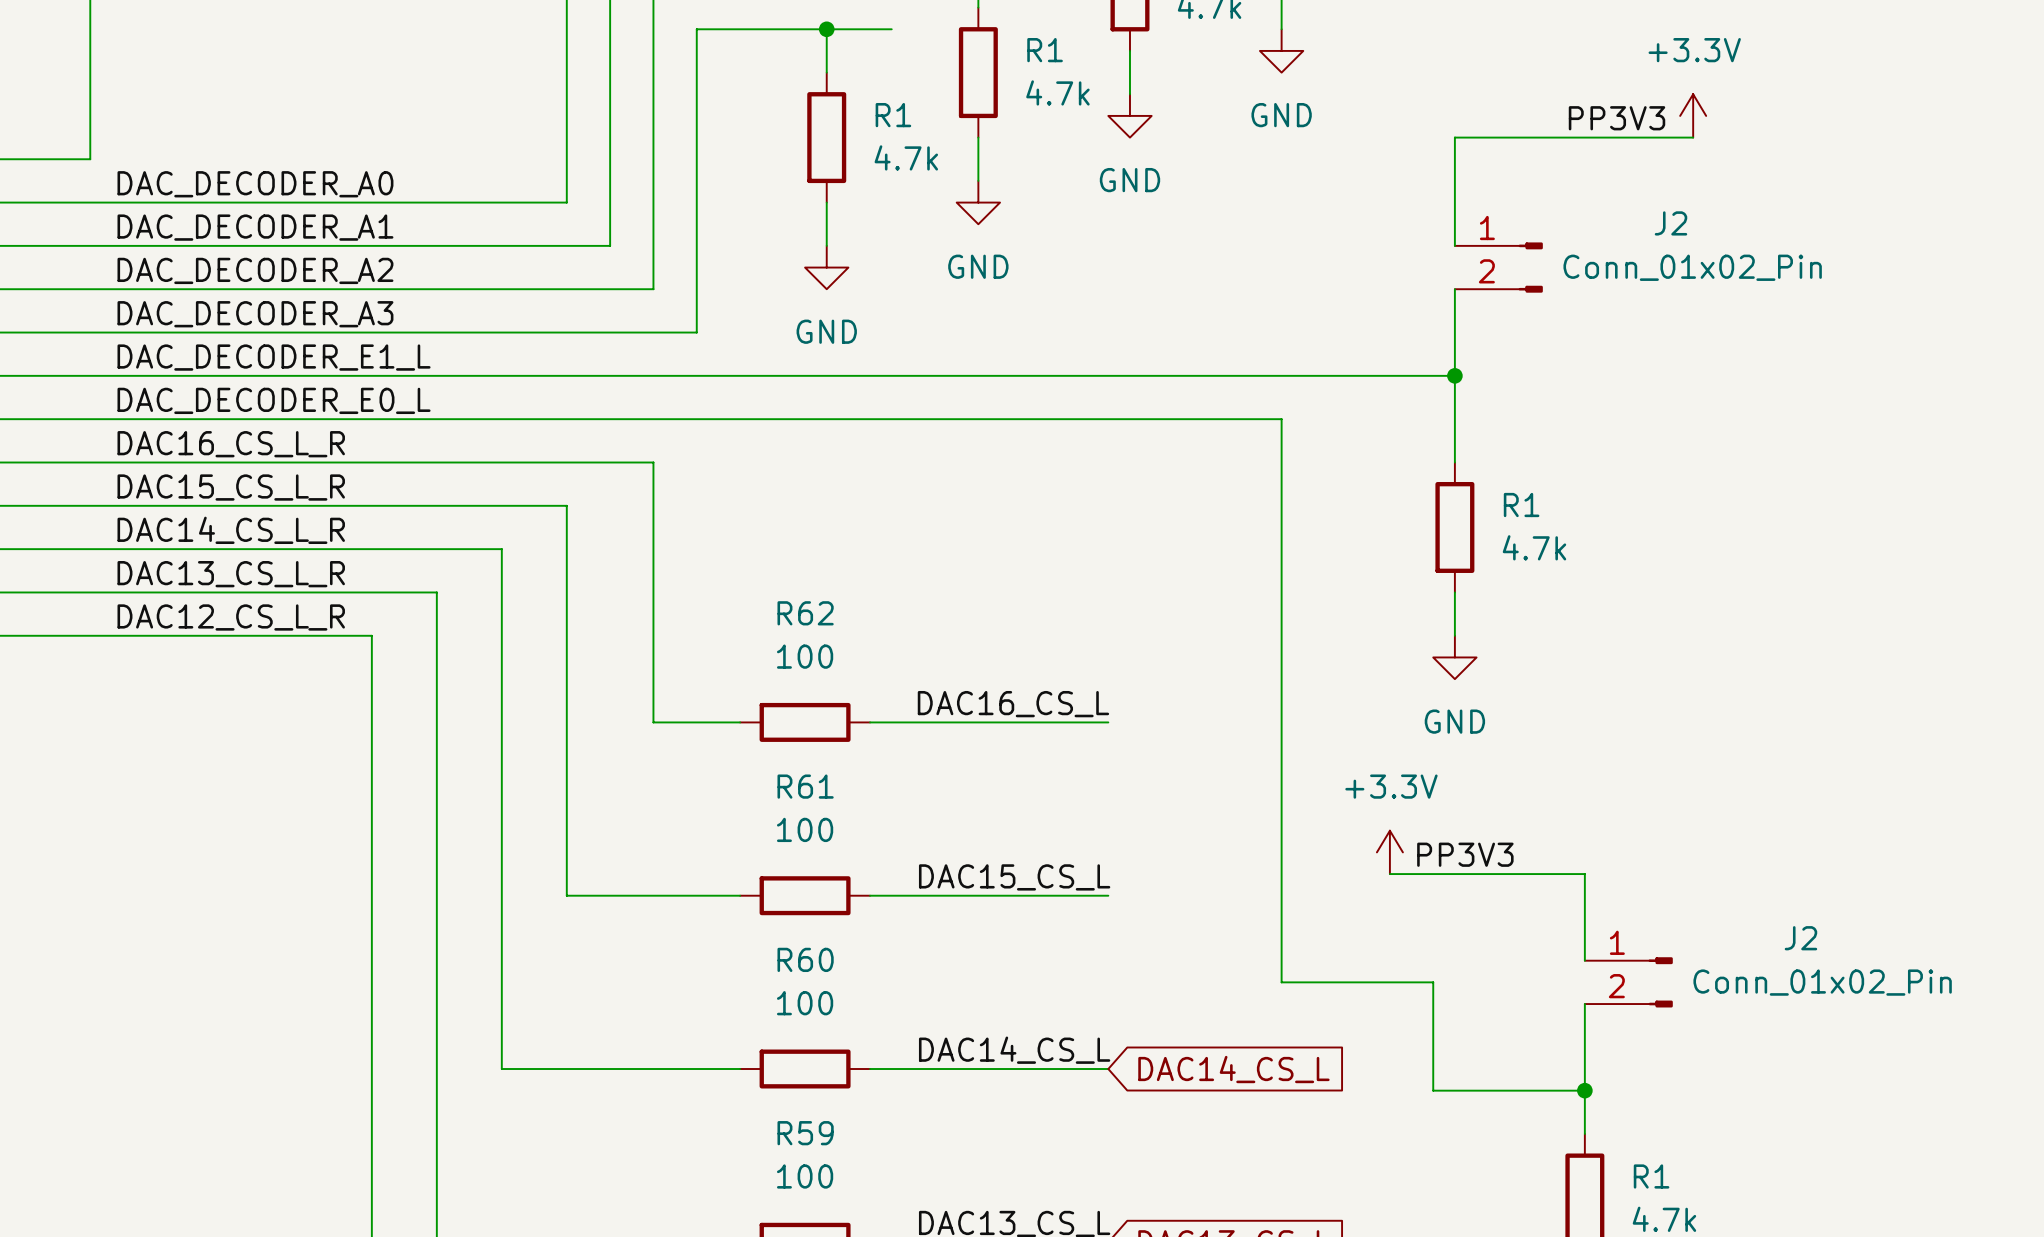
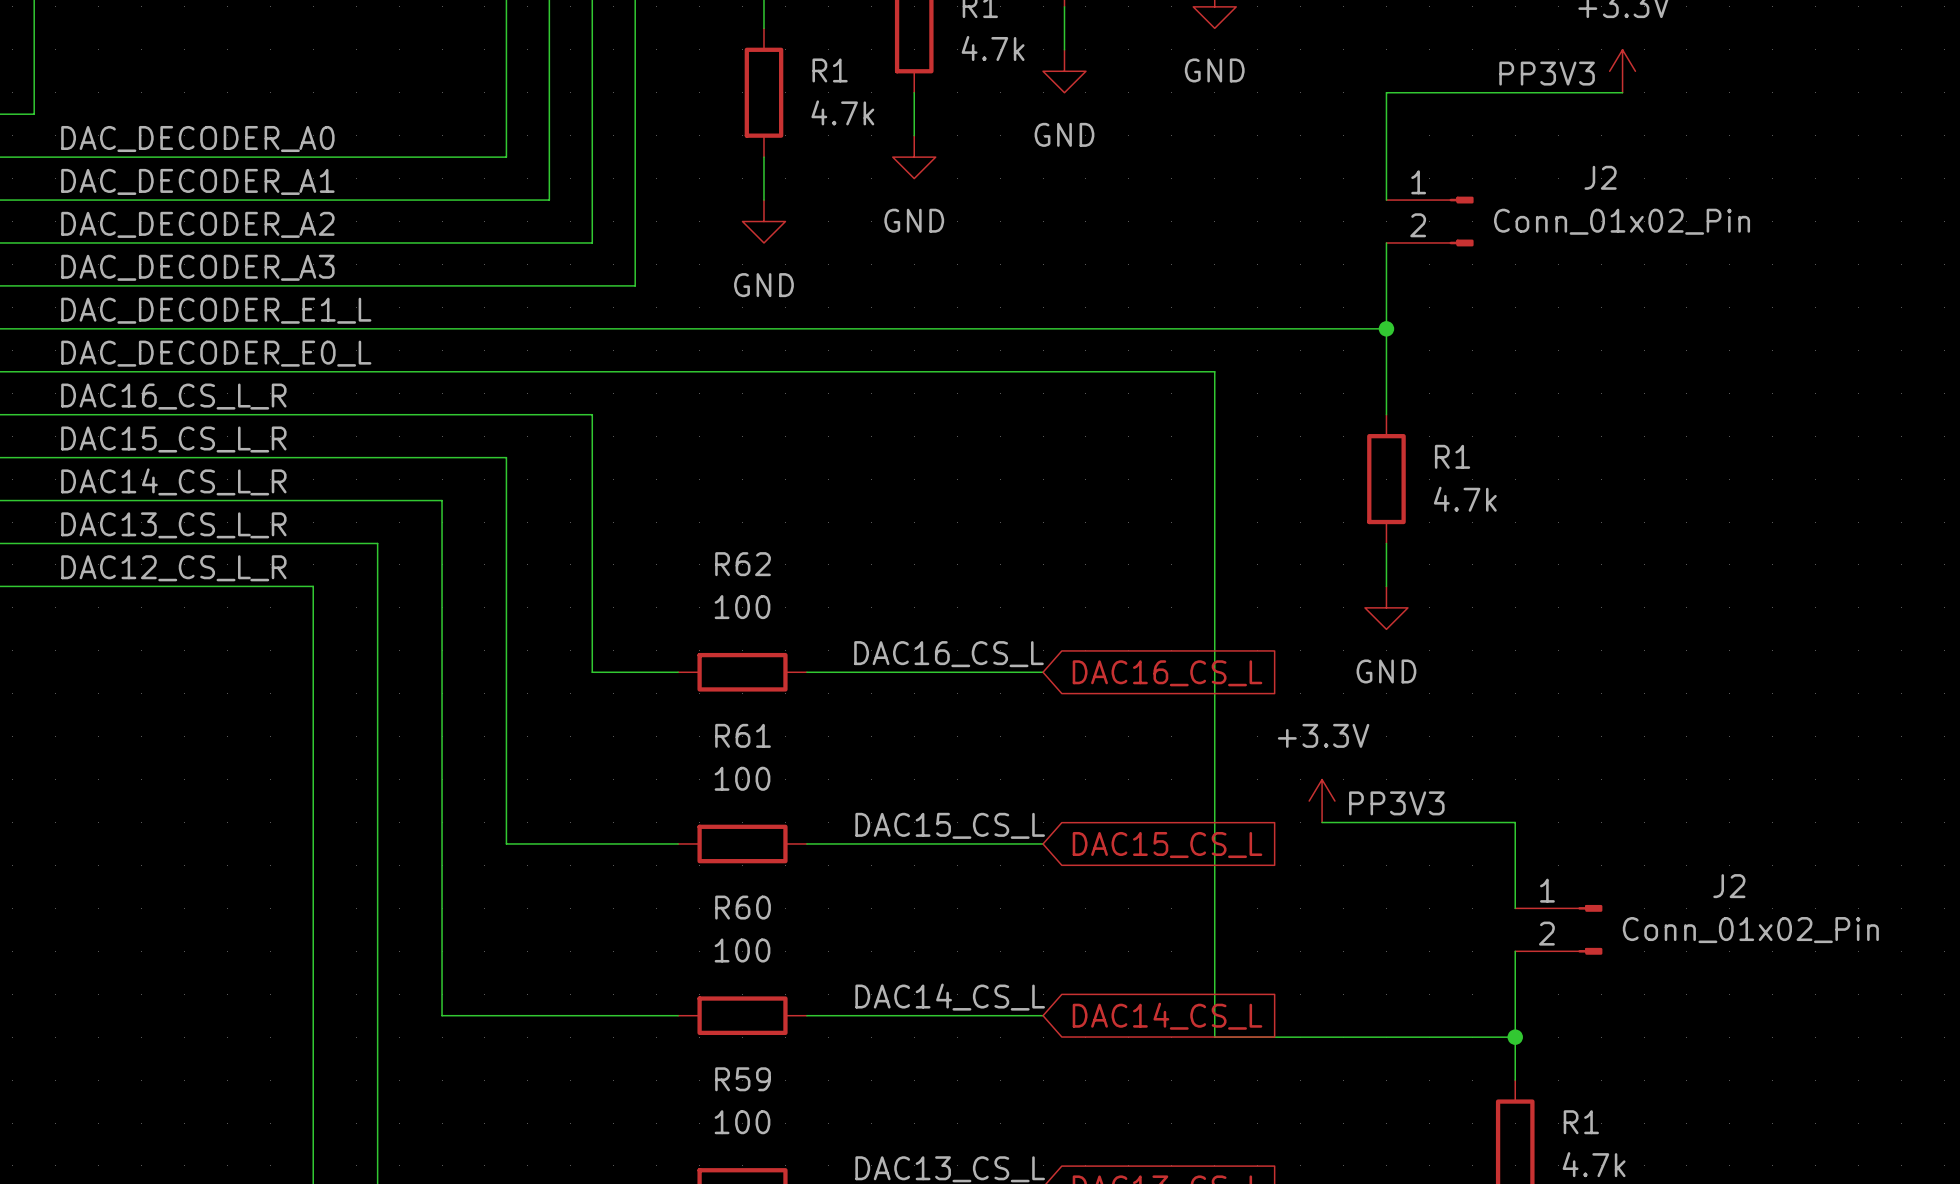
global label: none -> DAC16_CS_L (1167, 673)
global label: none -> DAC15_CS_L (1167, 845)
wire: (1281, 982) (1433, 982) (1433, 1090) -> (1214, 929) (1214, 1037) (1364, 1037)

